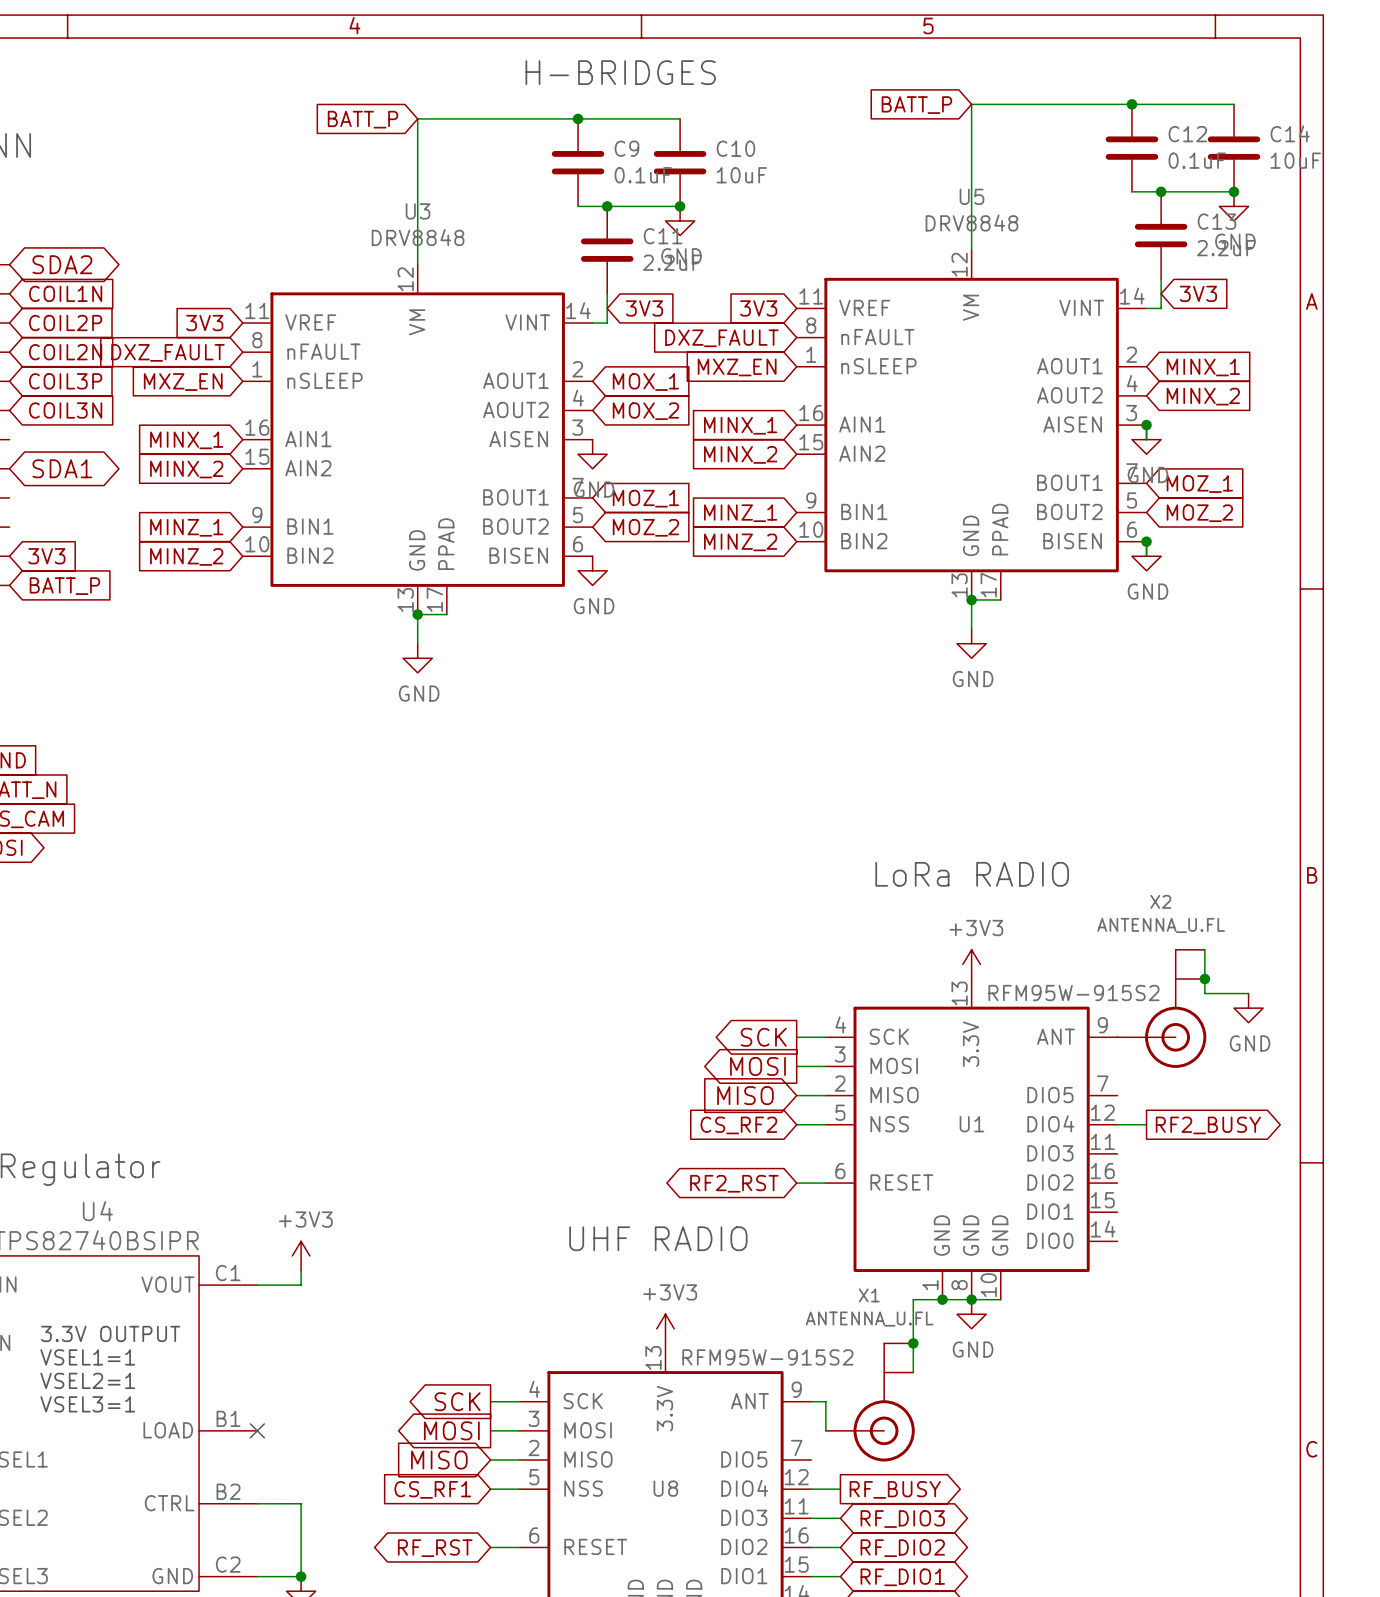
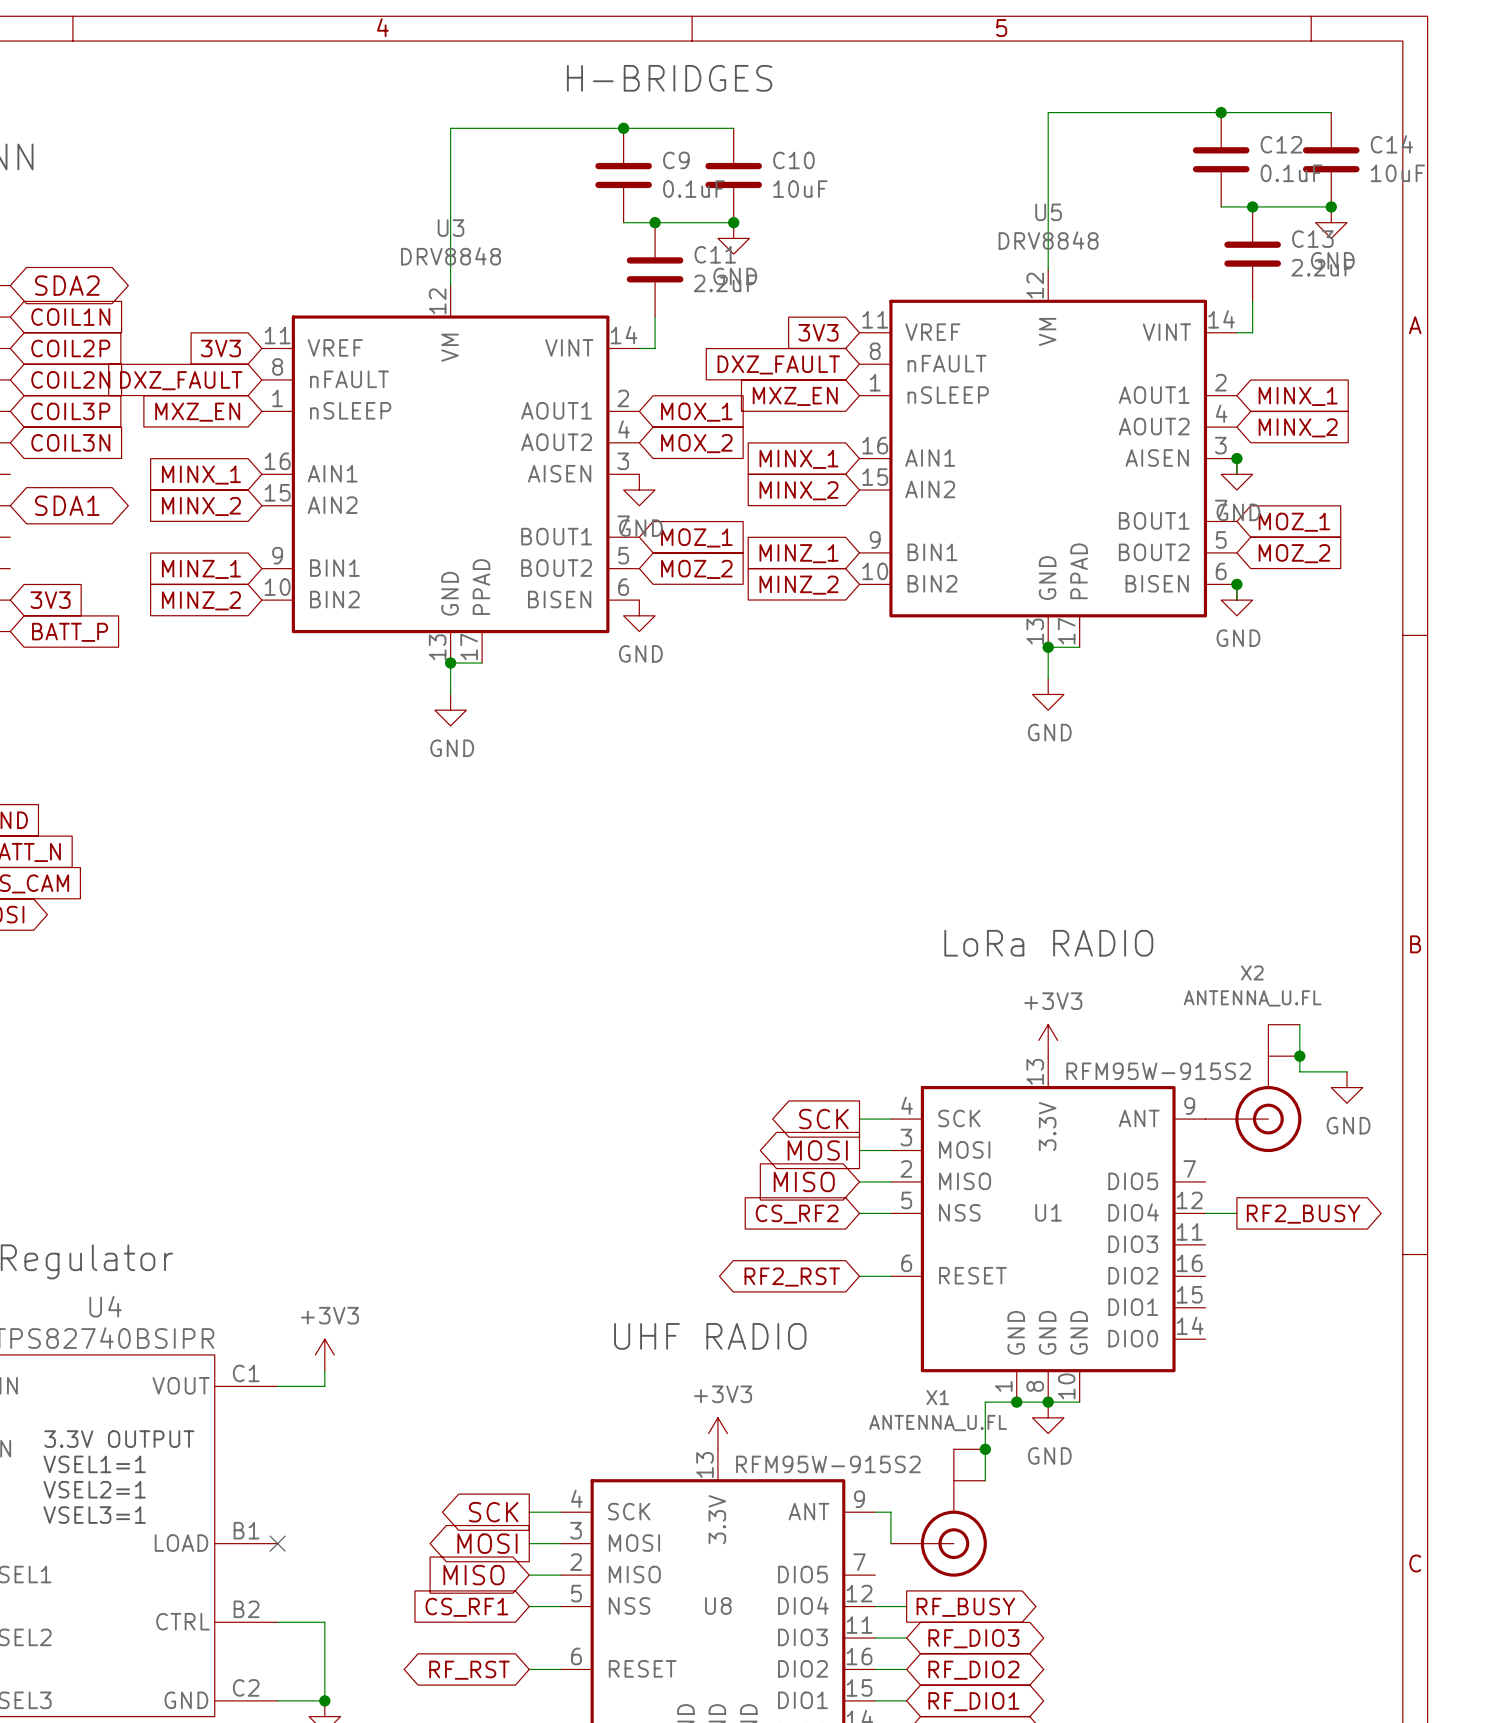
global label: BATT_P (916, 105) -> none
global label: BATT_P (363, 119) -> none
global label: 3V3 (1198, 293) -> none
global label: 3V3 (644, 308) -> none

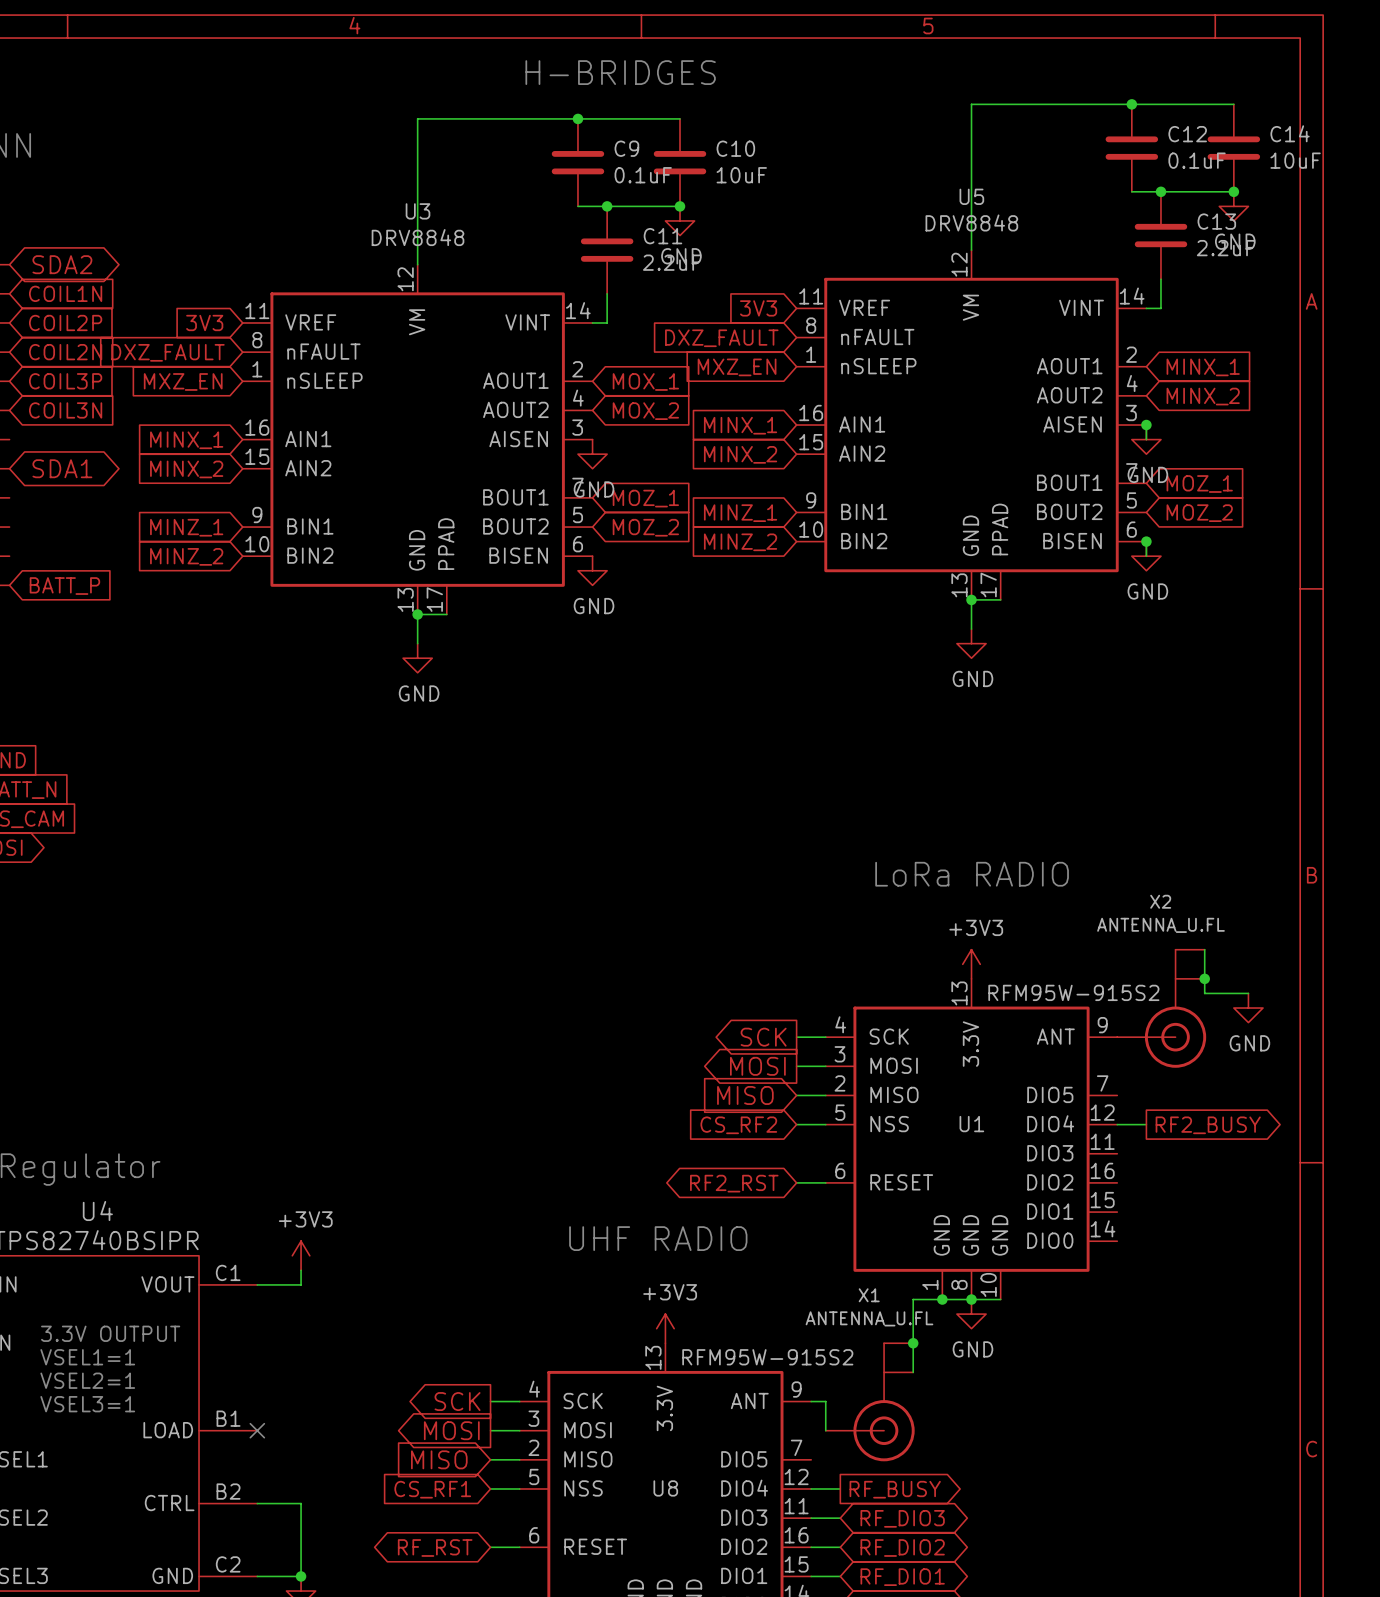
global label: 3V3 (50, 600) -> none

